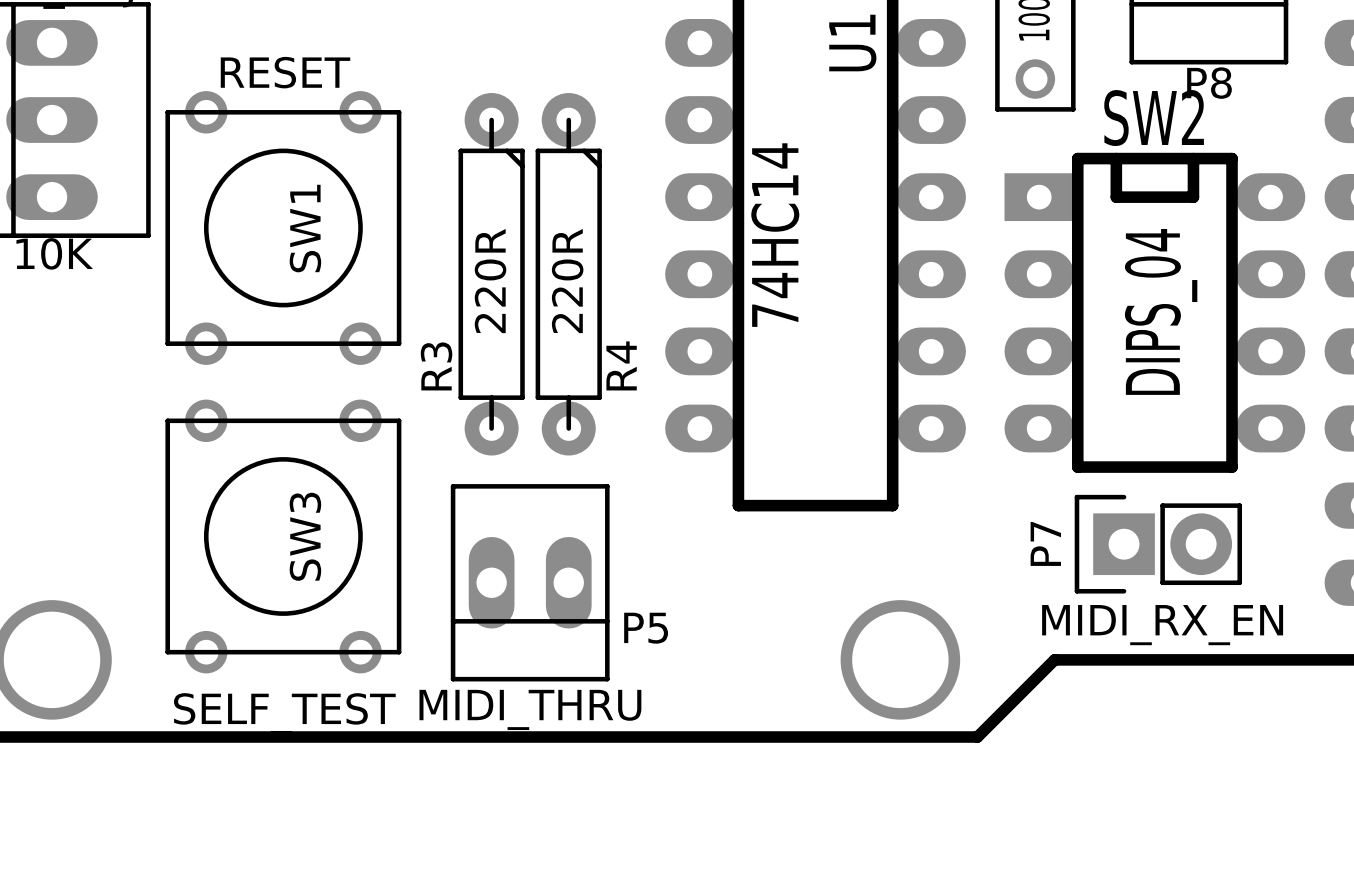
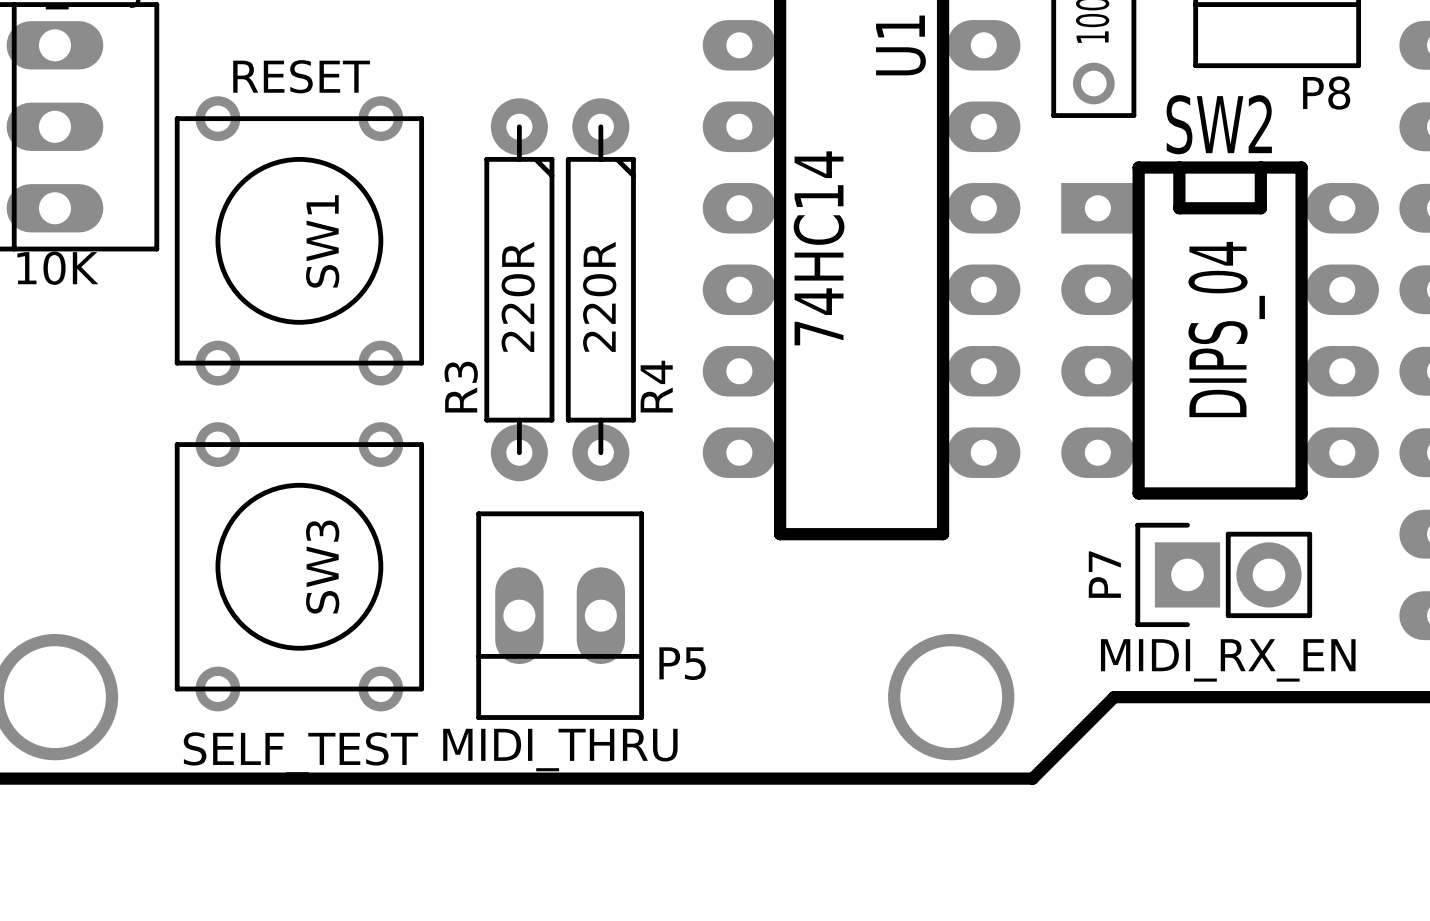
P8 name position: P8 (1209, 83) -> P8 (1326, 93)

